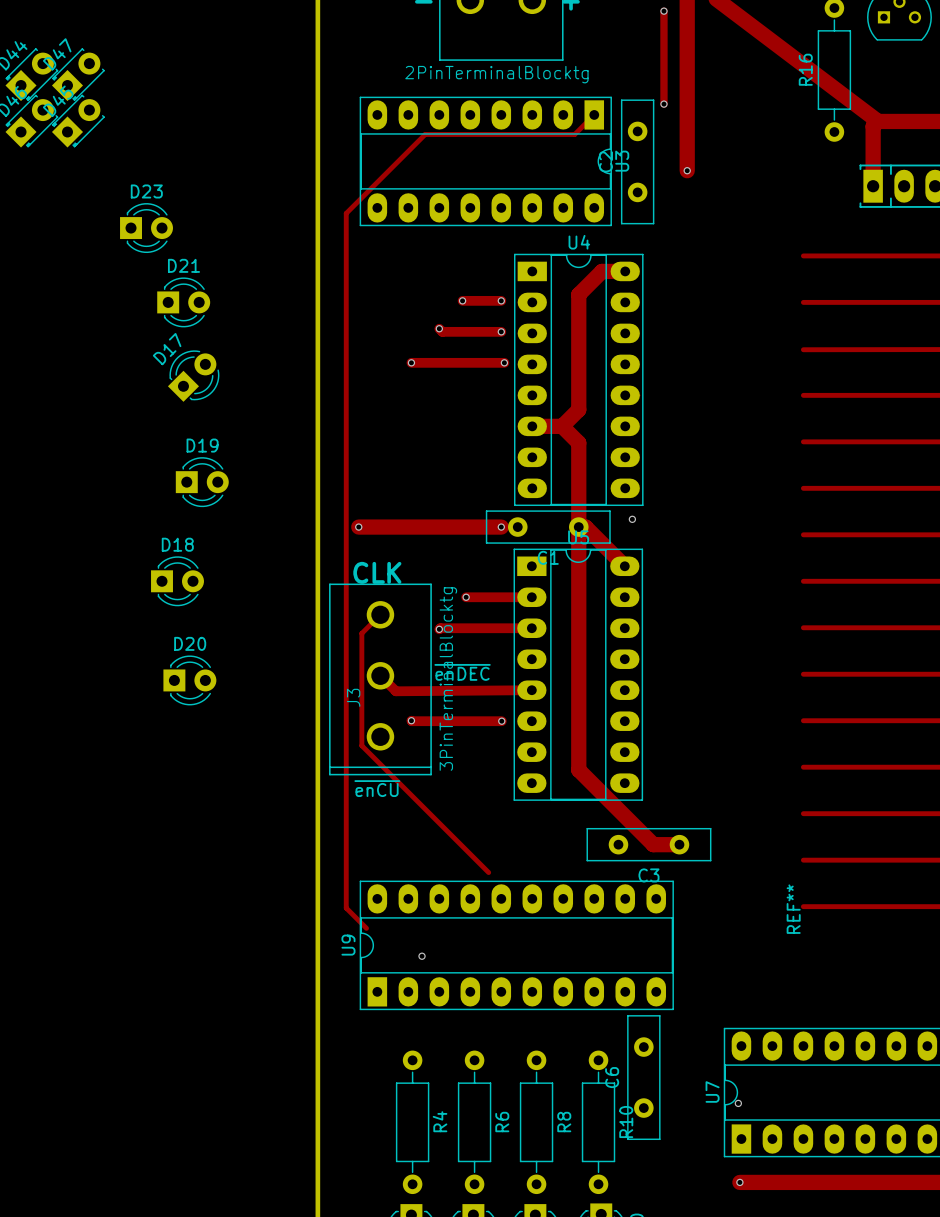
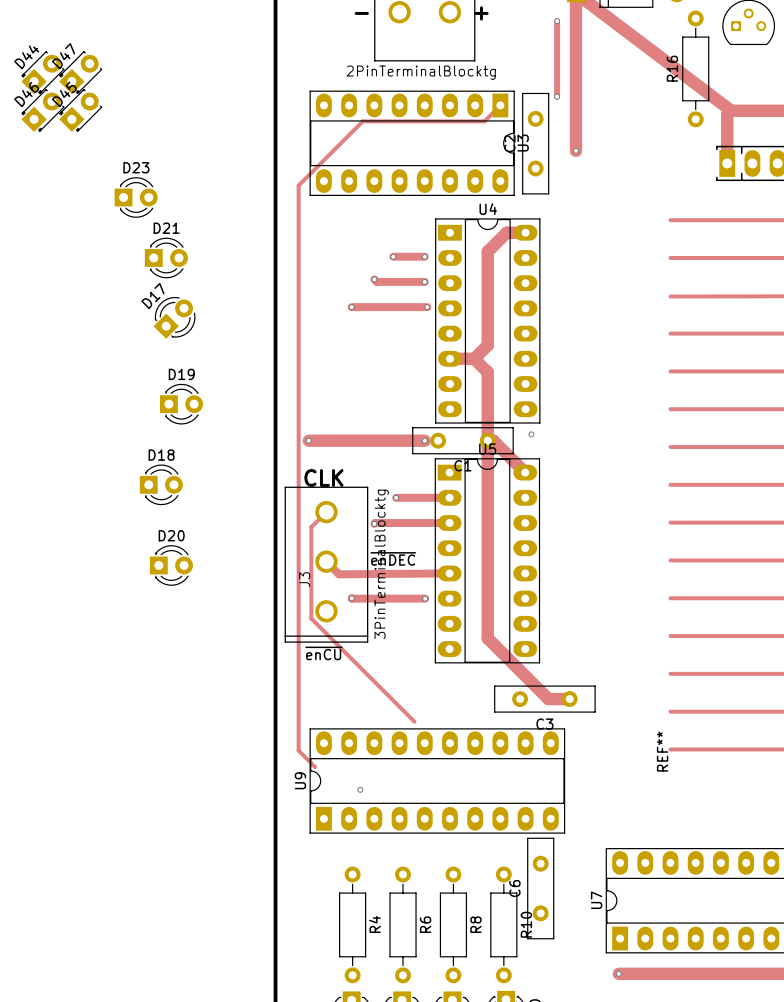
via: (738, 1103) -> none

